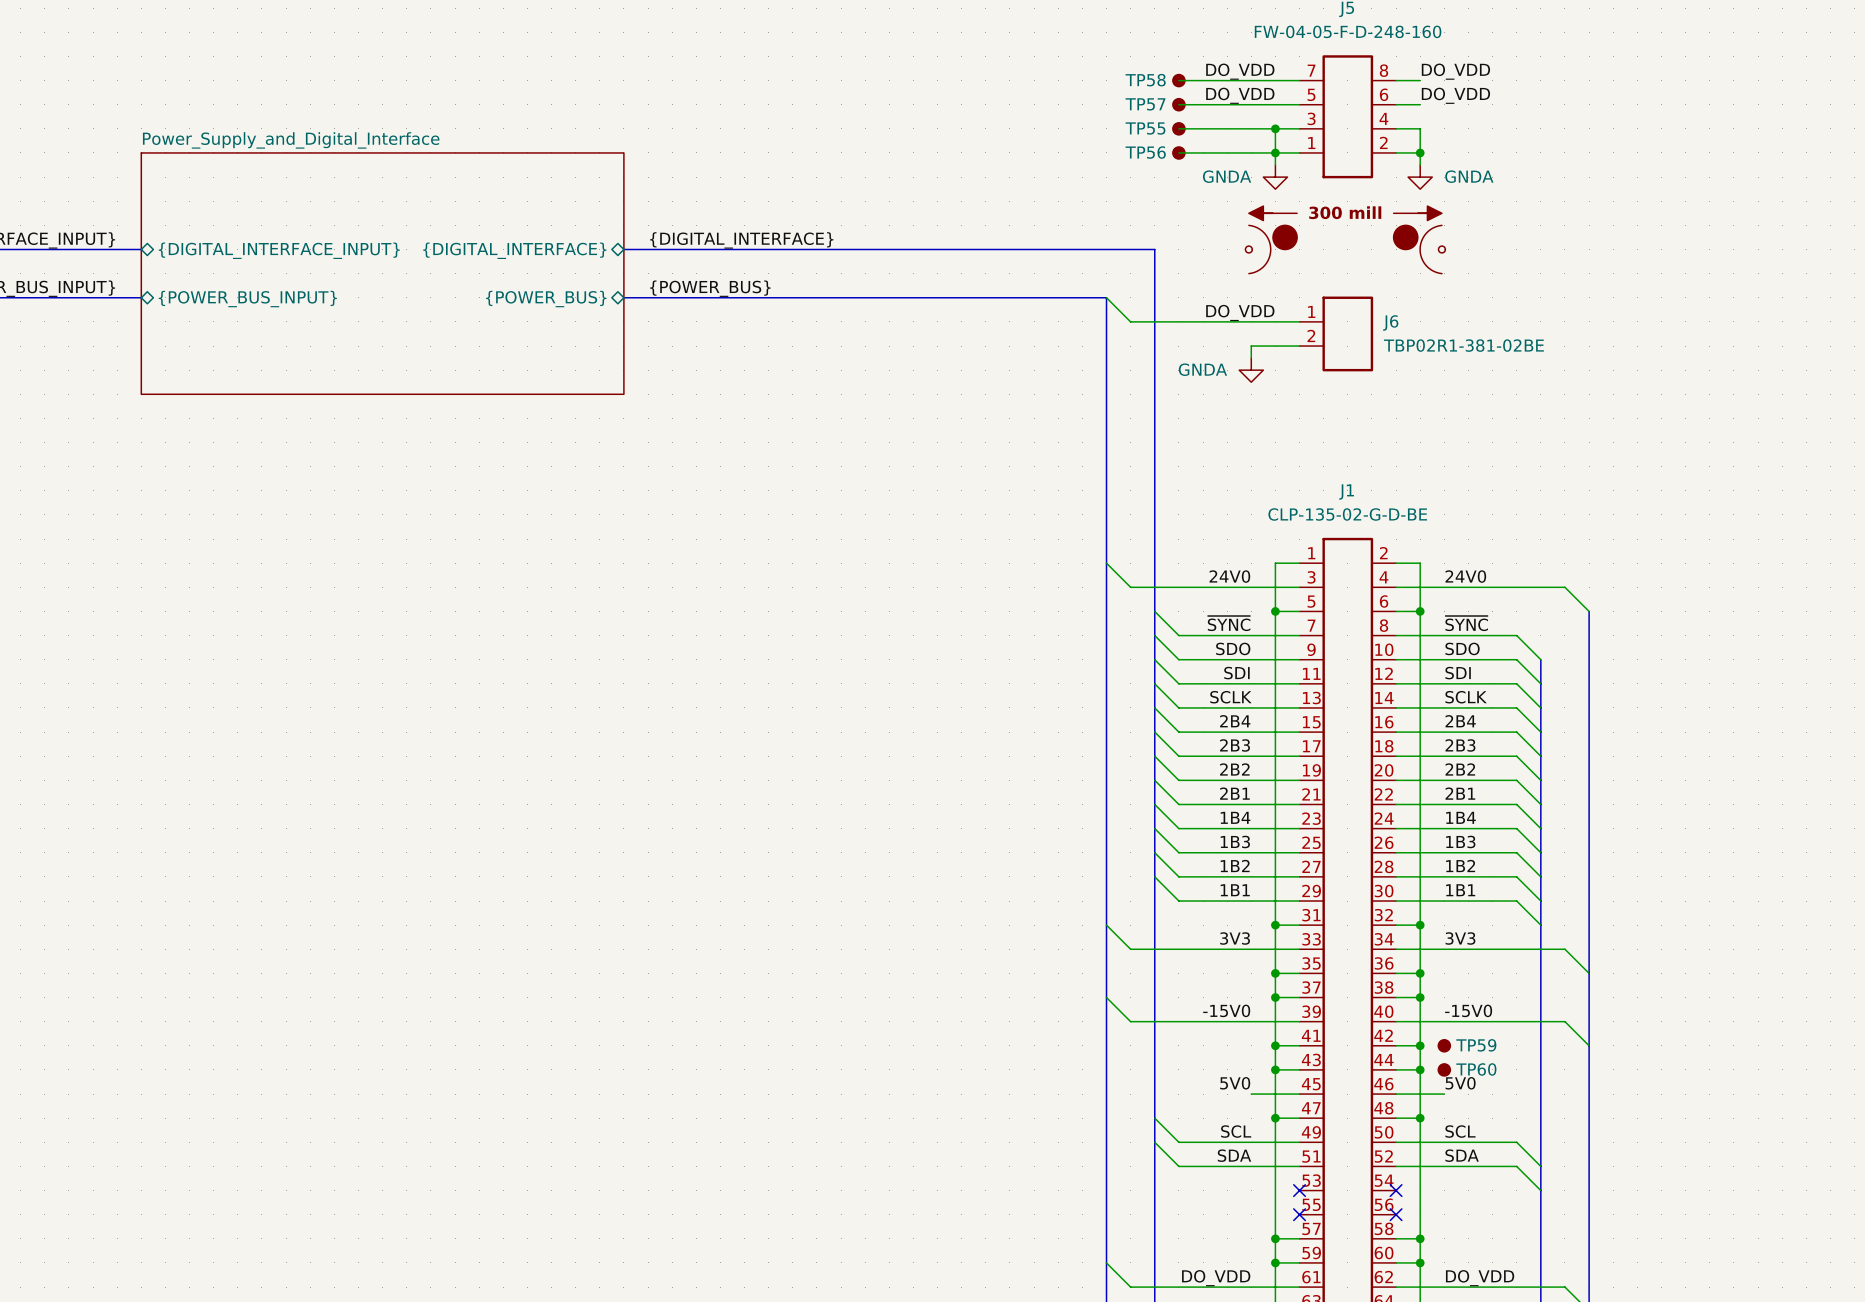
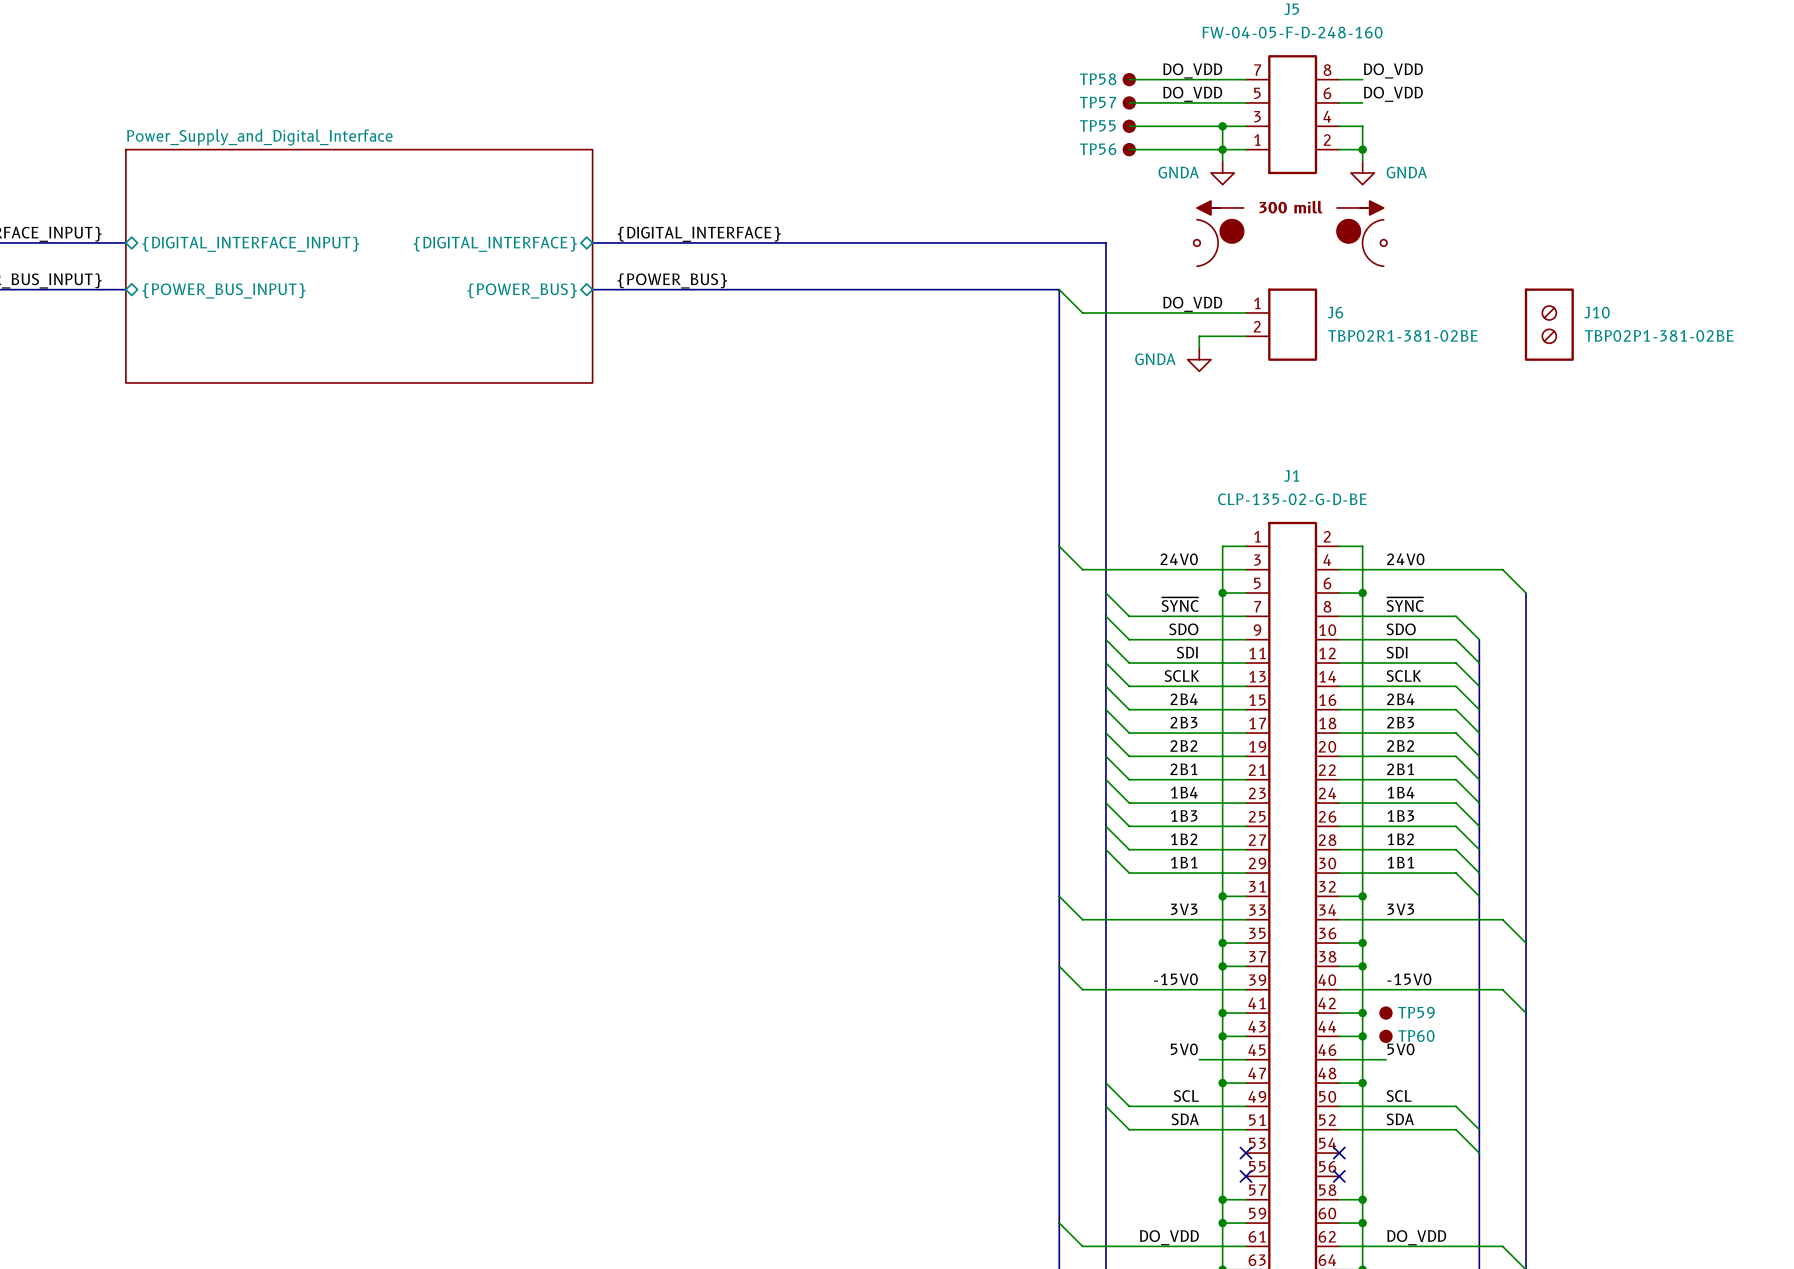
J10: none -> TBP02P1-381-02BE (1549, 324)

